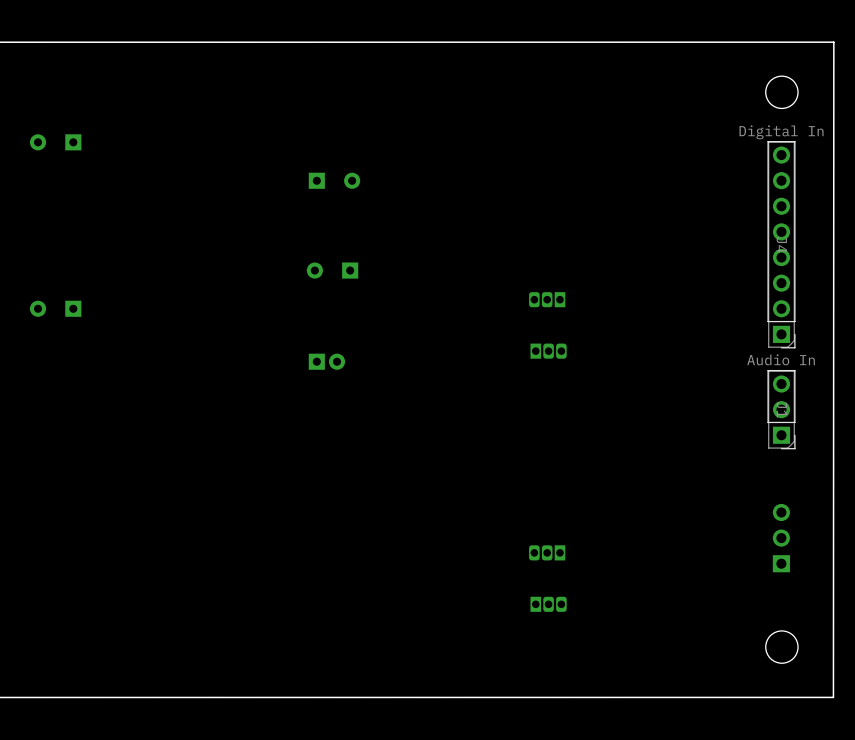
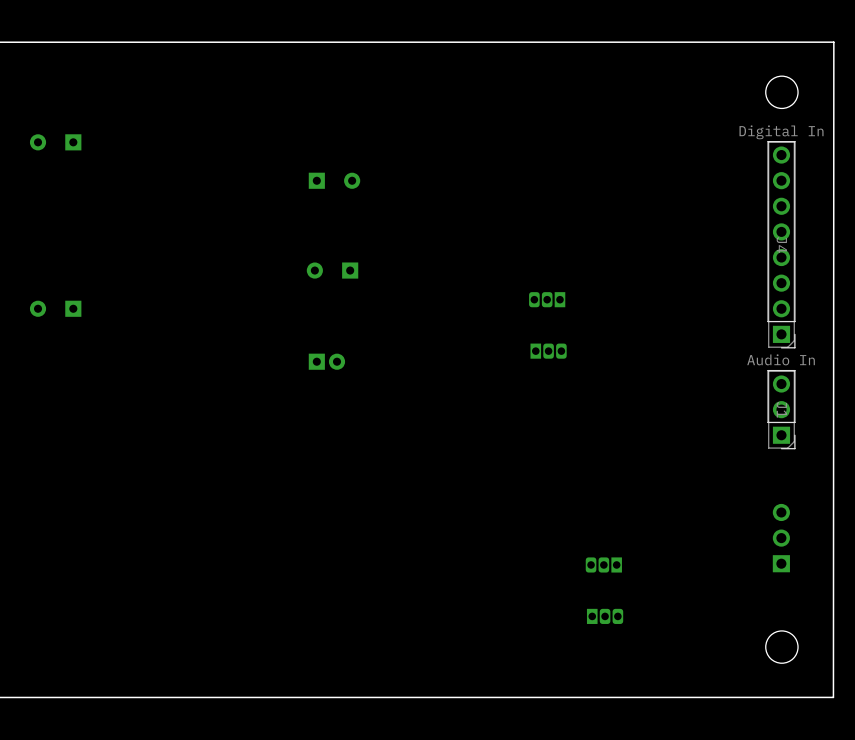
part: (547, 552) -> none
part: none -> (603, 564)
part: (548, 604) -> none
part: none -> (605, 616)

